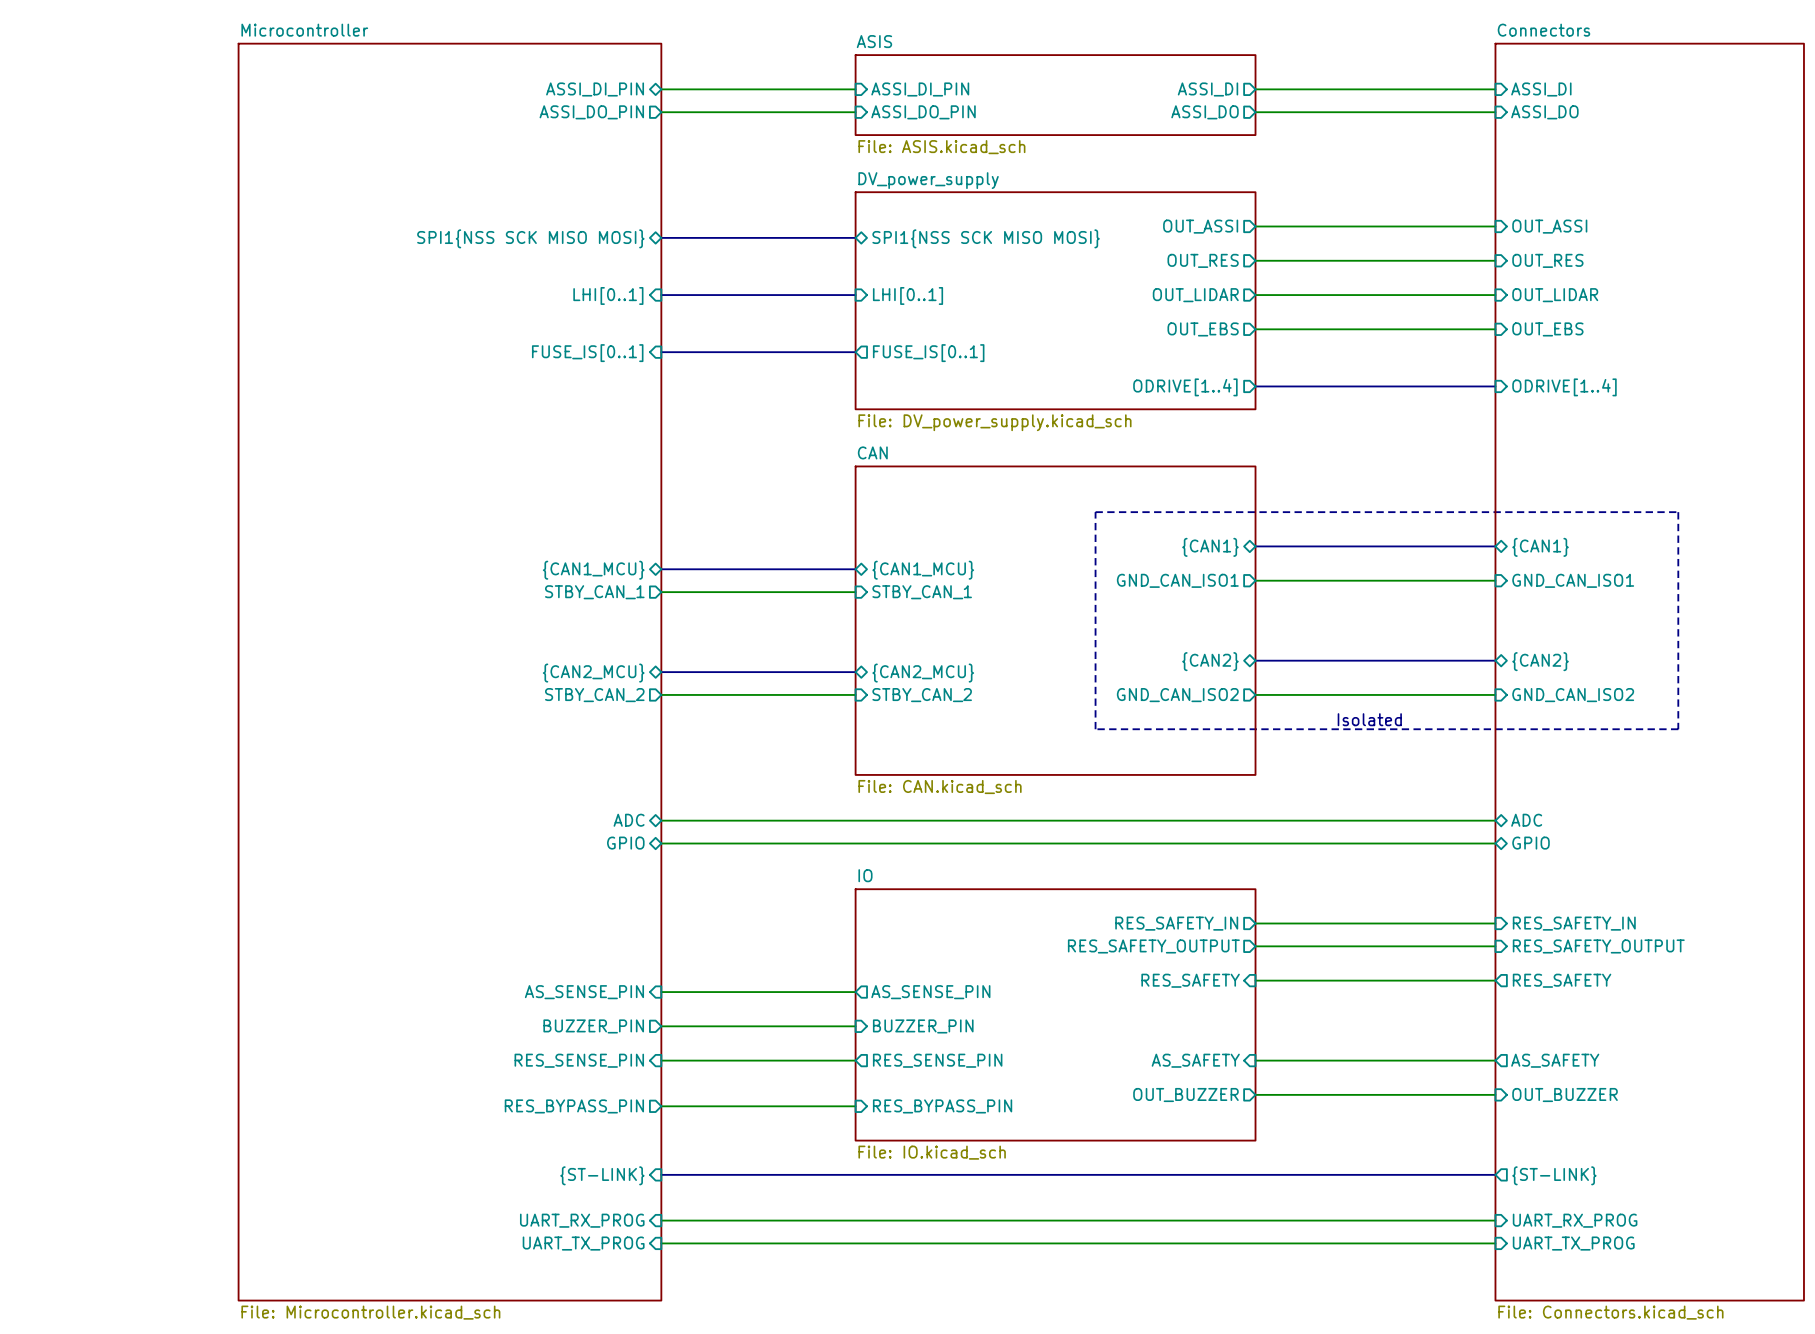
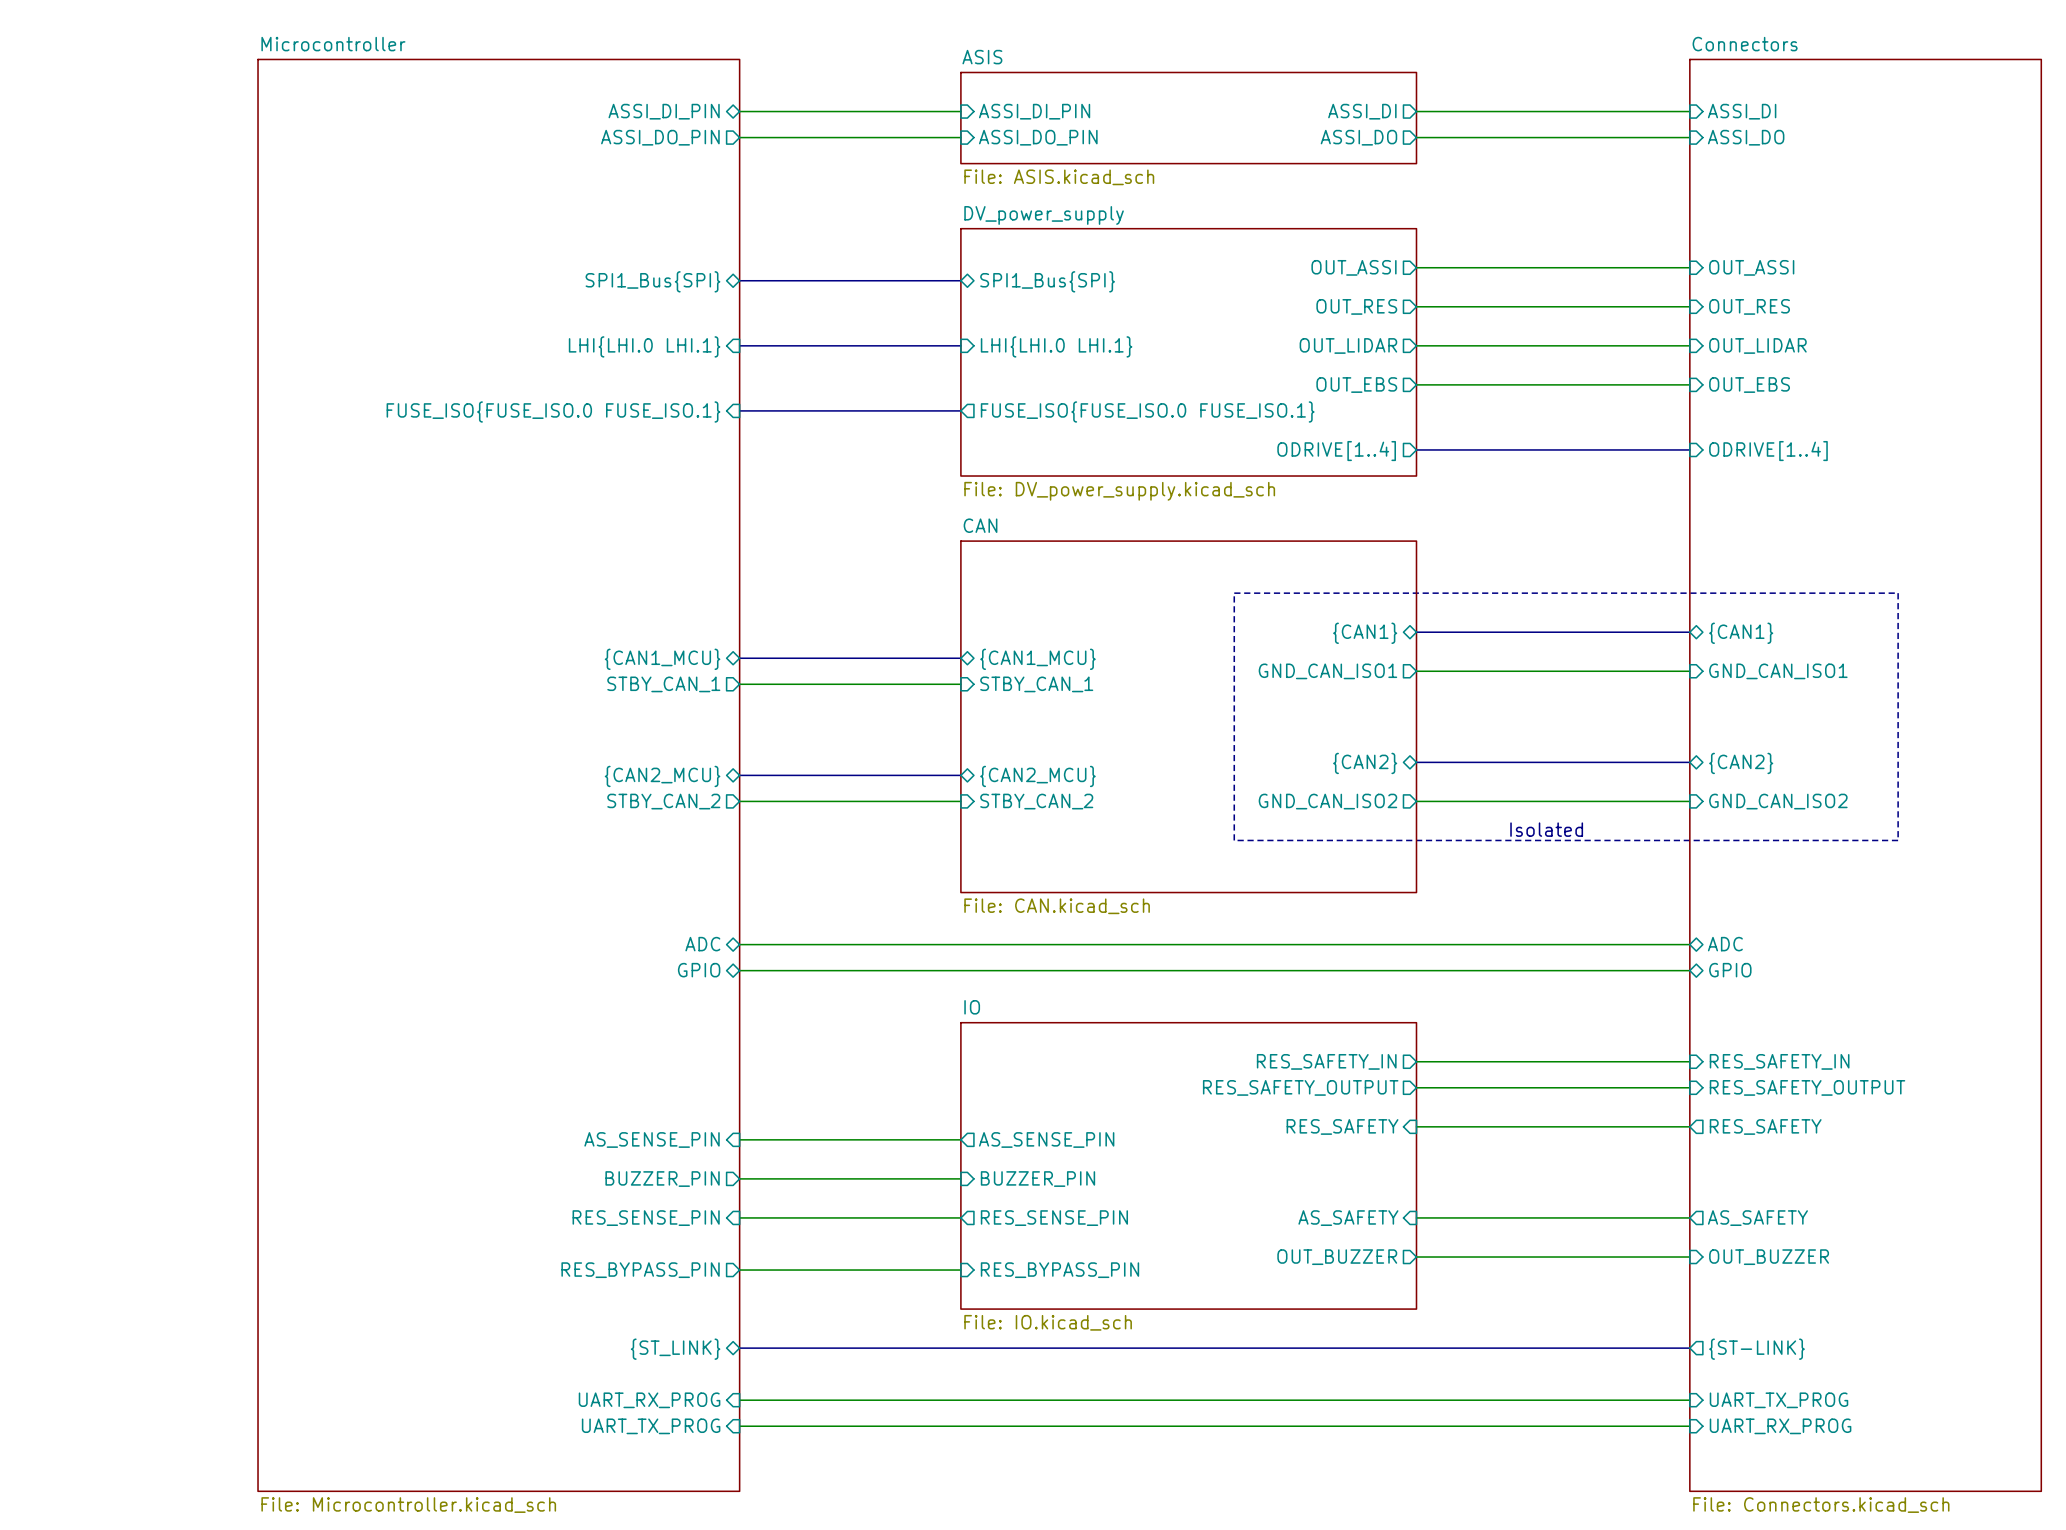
sheet pin: SPI1{NSS SCK MISO MOSI} (530, 238) -> SPI1_Bus{SPI} (652, 281)
sheet pin: SPI1{NSS SCK MISO MOSI} (986, 238) -> SPI1_Bus{SPI} (1047, 281)
sheet pin: LHI[0..1] (608, 295) -> LHI{LHI.0 LHI.1} (644, 346)
sheet pin: LHI[0..1] (908, 295) -> LHI{LHI.0 LHI.1} (1056, 346)
sheet pin: FUSE_IS[0..1] (587, 353) -> FUSE_ISO{FUSE_ISO.0 FUSE_ISO.1} (553, 411)
sheet pin: FUSE_IS[0..1] (928, 353) -> FUSE_ISO{FUSE_ISO.0 FUSE_ISO.1} (1147, 411)
sheet pin shape: input (602, 1175) -> bidirectional (675, 1349)
sheet pin: {ST-LINK} (602, 1175) -> {ST_LINK} (675, 1349)
sheet pin: UART_RX_PROG (1575, 1220) -> UART_TX_PROG (1778, 1400)
sheet pin: UART_TX_PROG (1573, 1243) -> UART_RX_PROG (1780, 1426)

